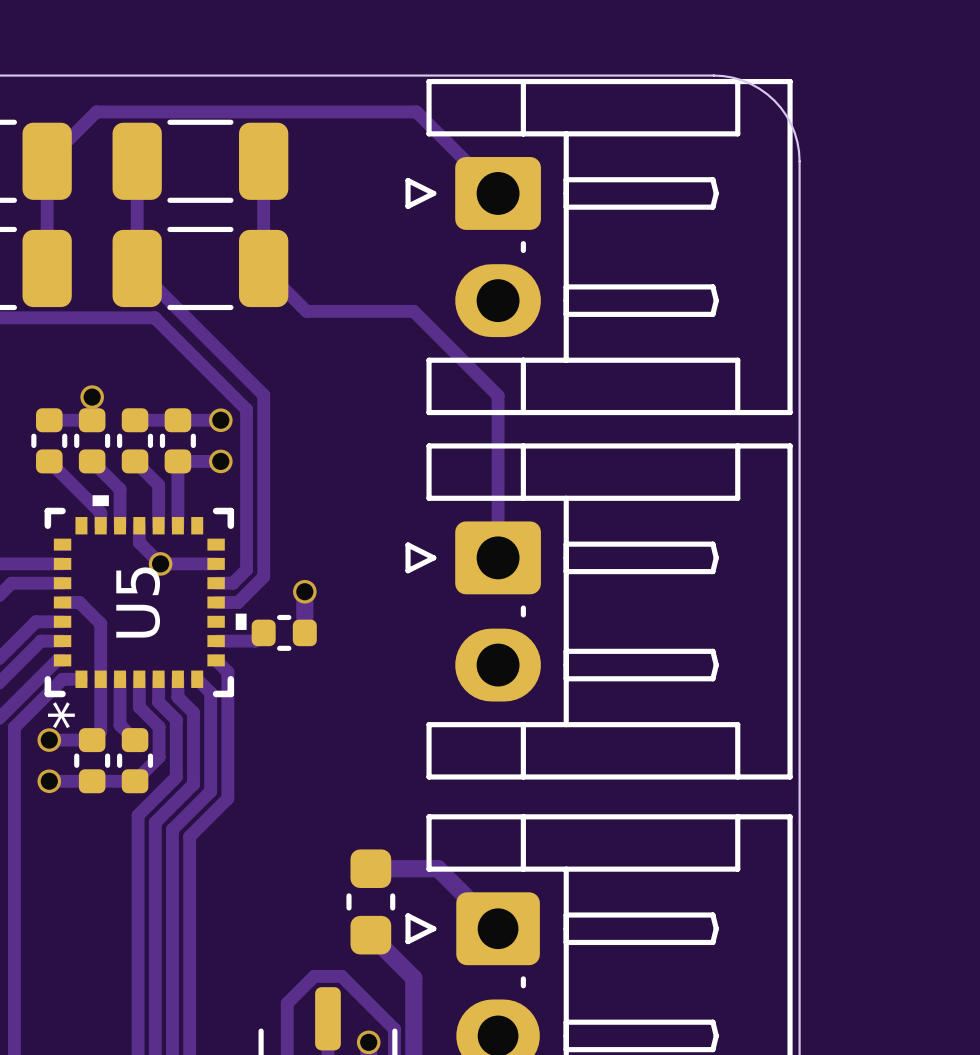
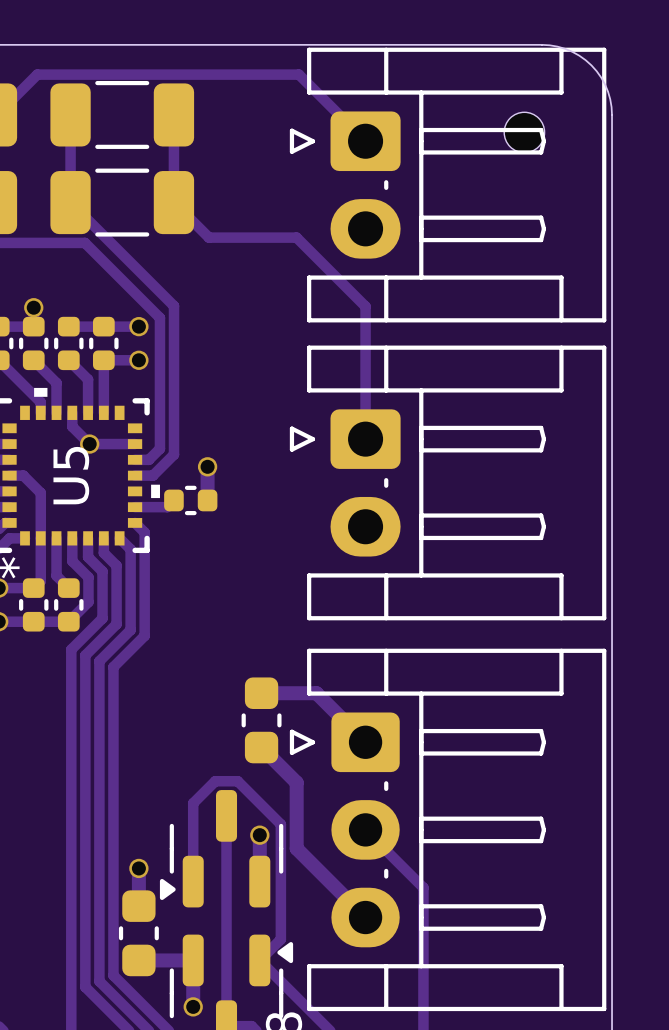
part: none -> (524, 132)

